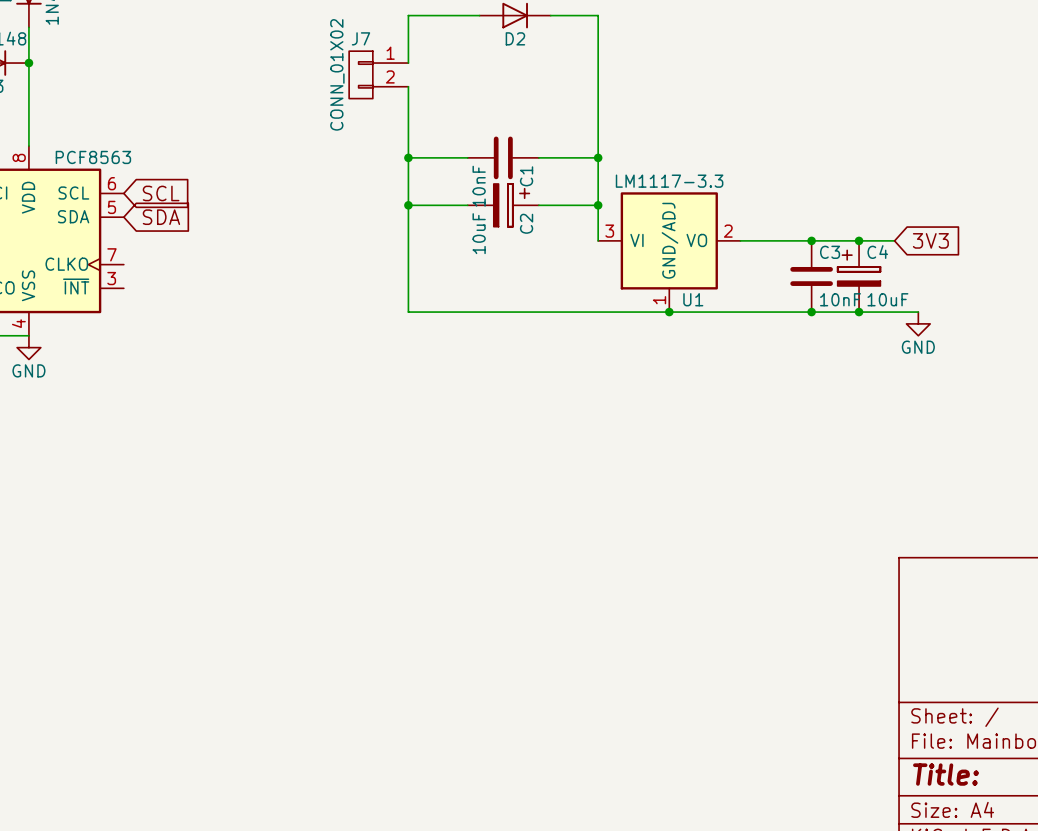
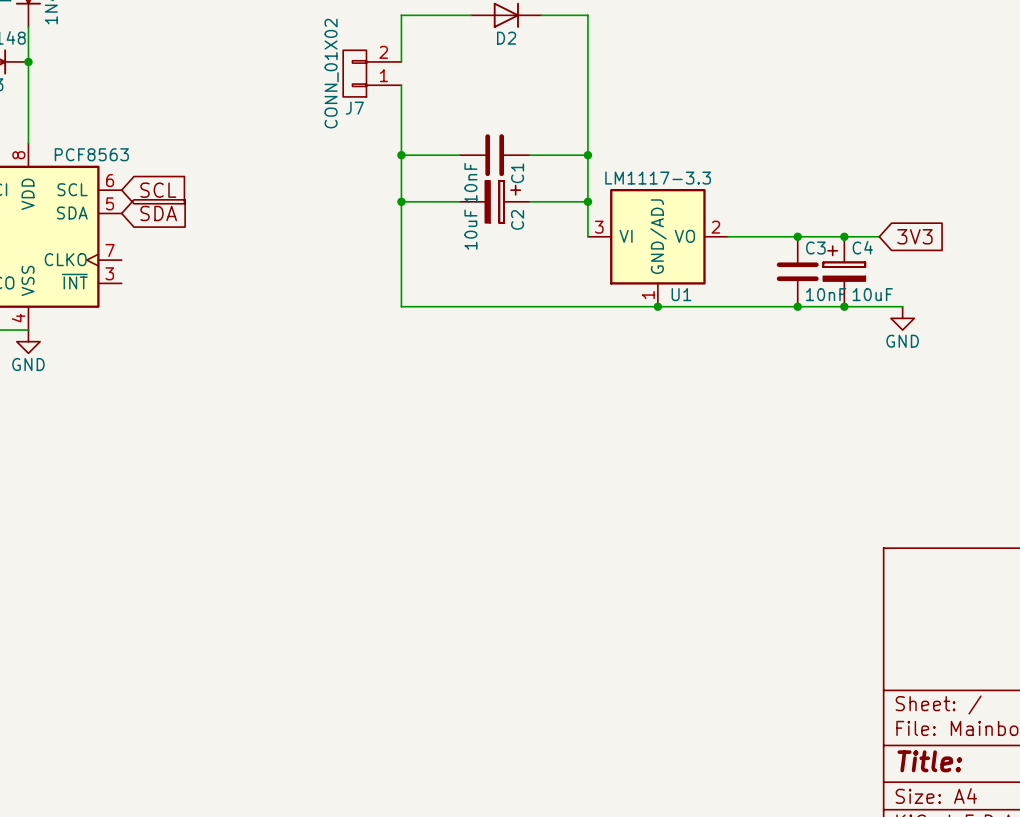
J7 flip: as is (360, 74) -> up-down (354, 73)

